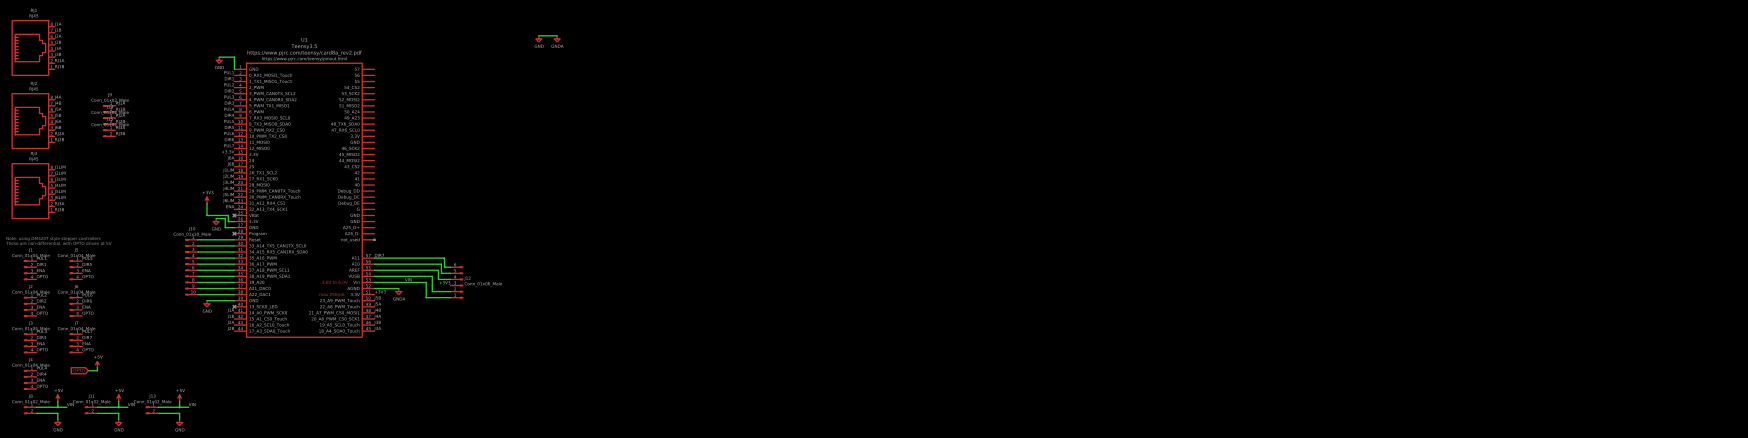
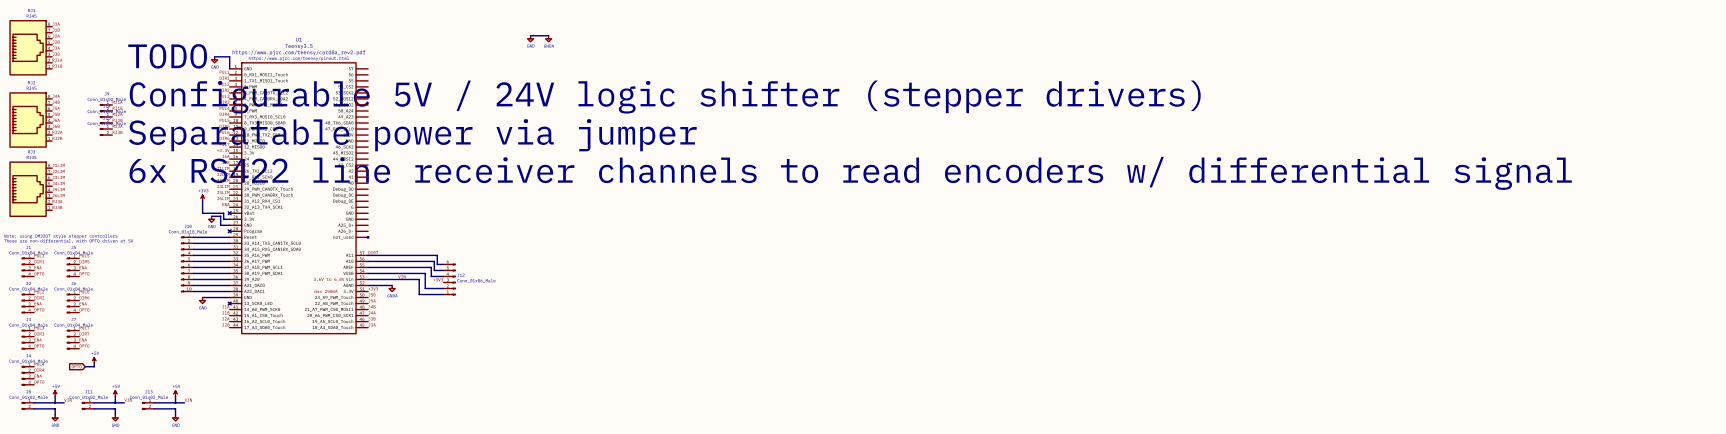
text: none -> TODO (167, 56)
text: none -> Configurable 5V / 24V logic shifter (stepper drivers) (665, 97)
text: none -> Separatable power via jumper (412, 135)
text: none -> 6x RS422 line receiver channels to read encoders w/ differential signal (850, 173)

